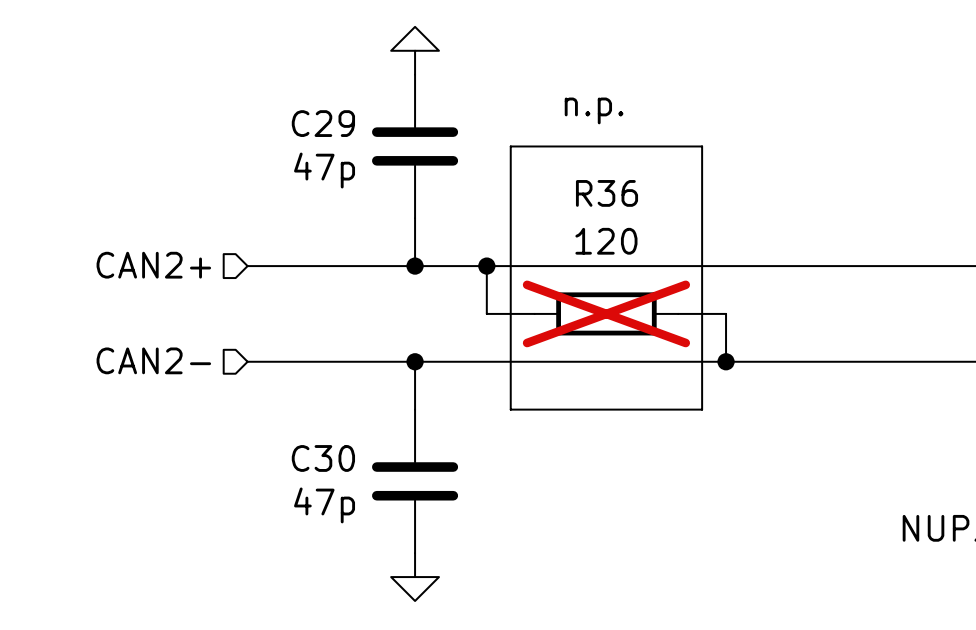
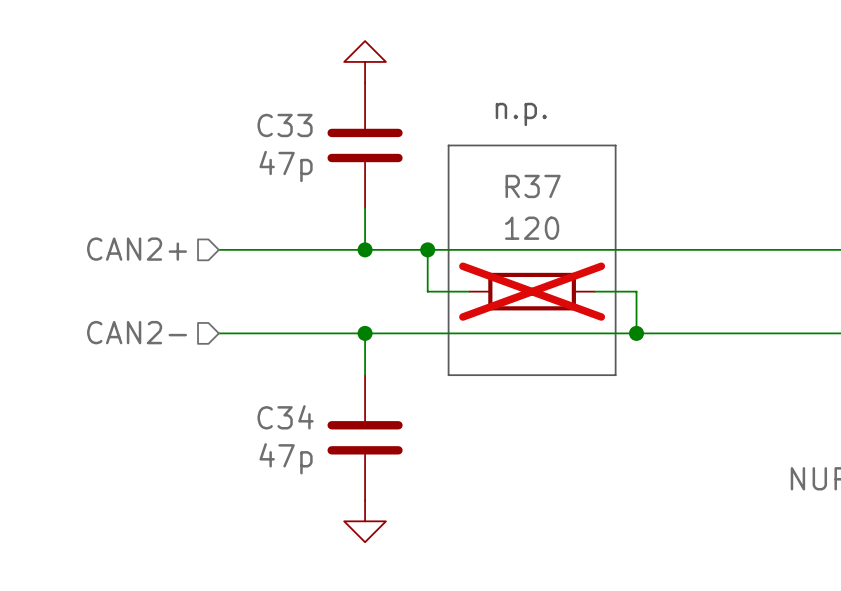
C29 name: C29 (323, 123) -> C33 (285, 125)
R36 name: R36 (607, 193) -> R37 (533, 186)
C30 name: C30 (323, 458) -> C34 (285, 417)

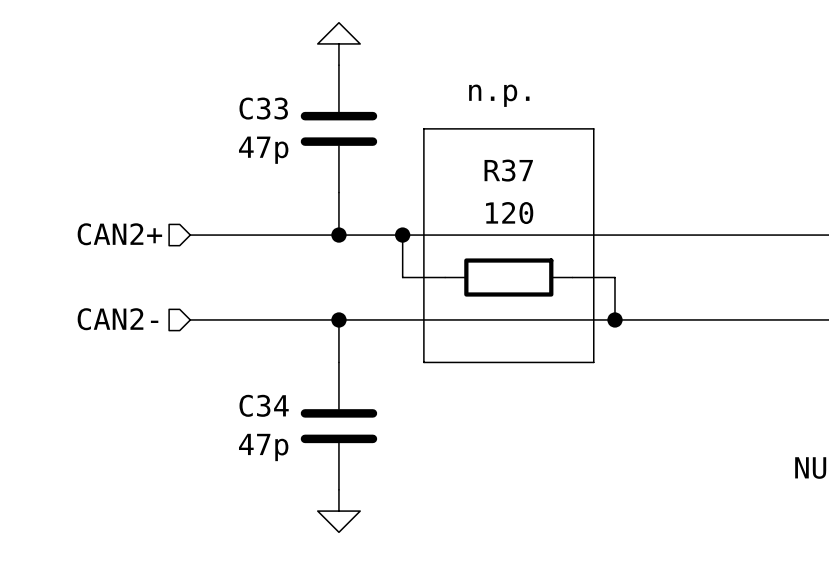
R37 do-not-place cross: (532, 291) -> none

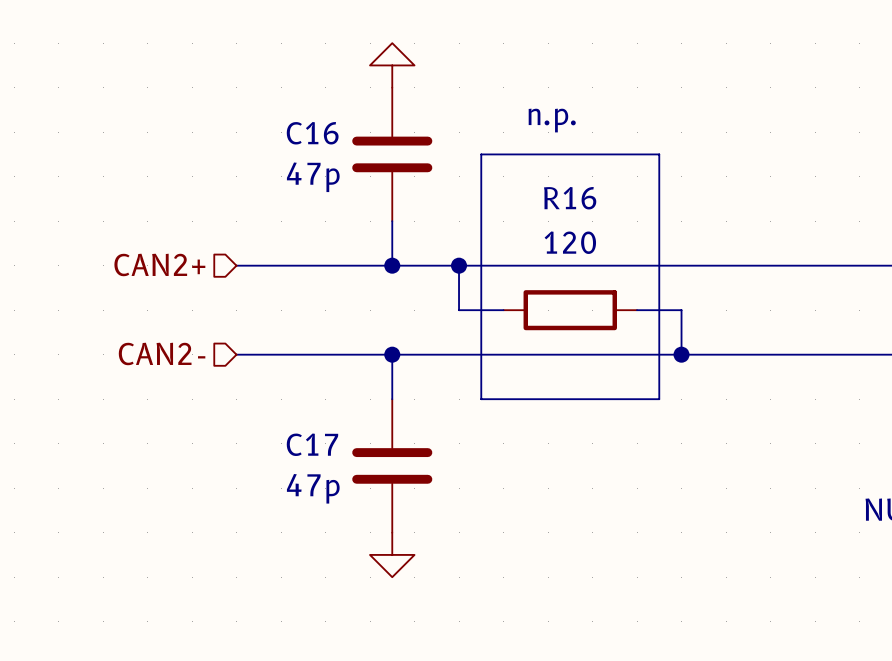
C33 name: C33 (263, 108) -> C16 (312, 133)
R37 name: R37 (508, 170) -> R16 (570, 198)
C34 name: C34 (264, 405) -> C17 (312, 444)

